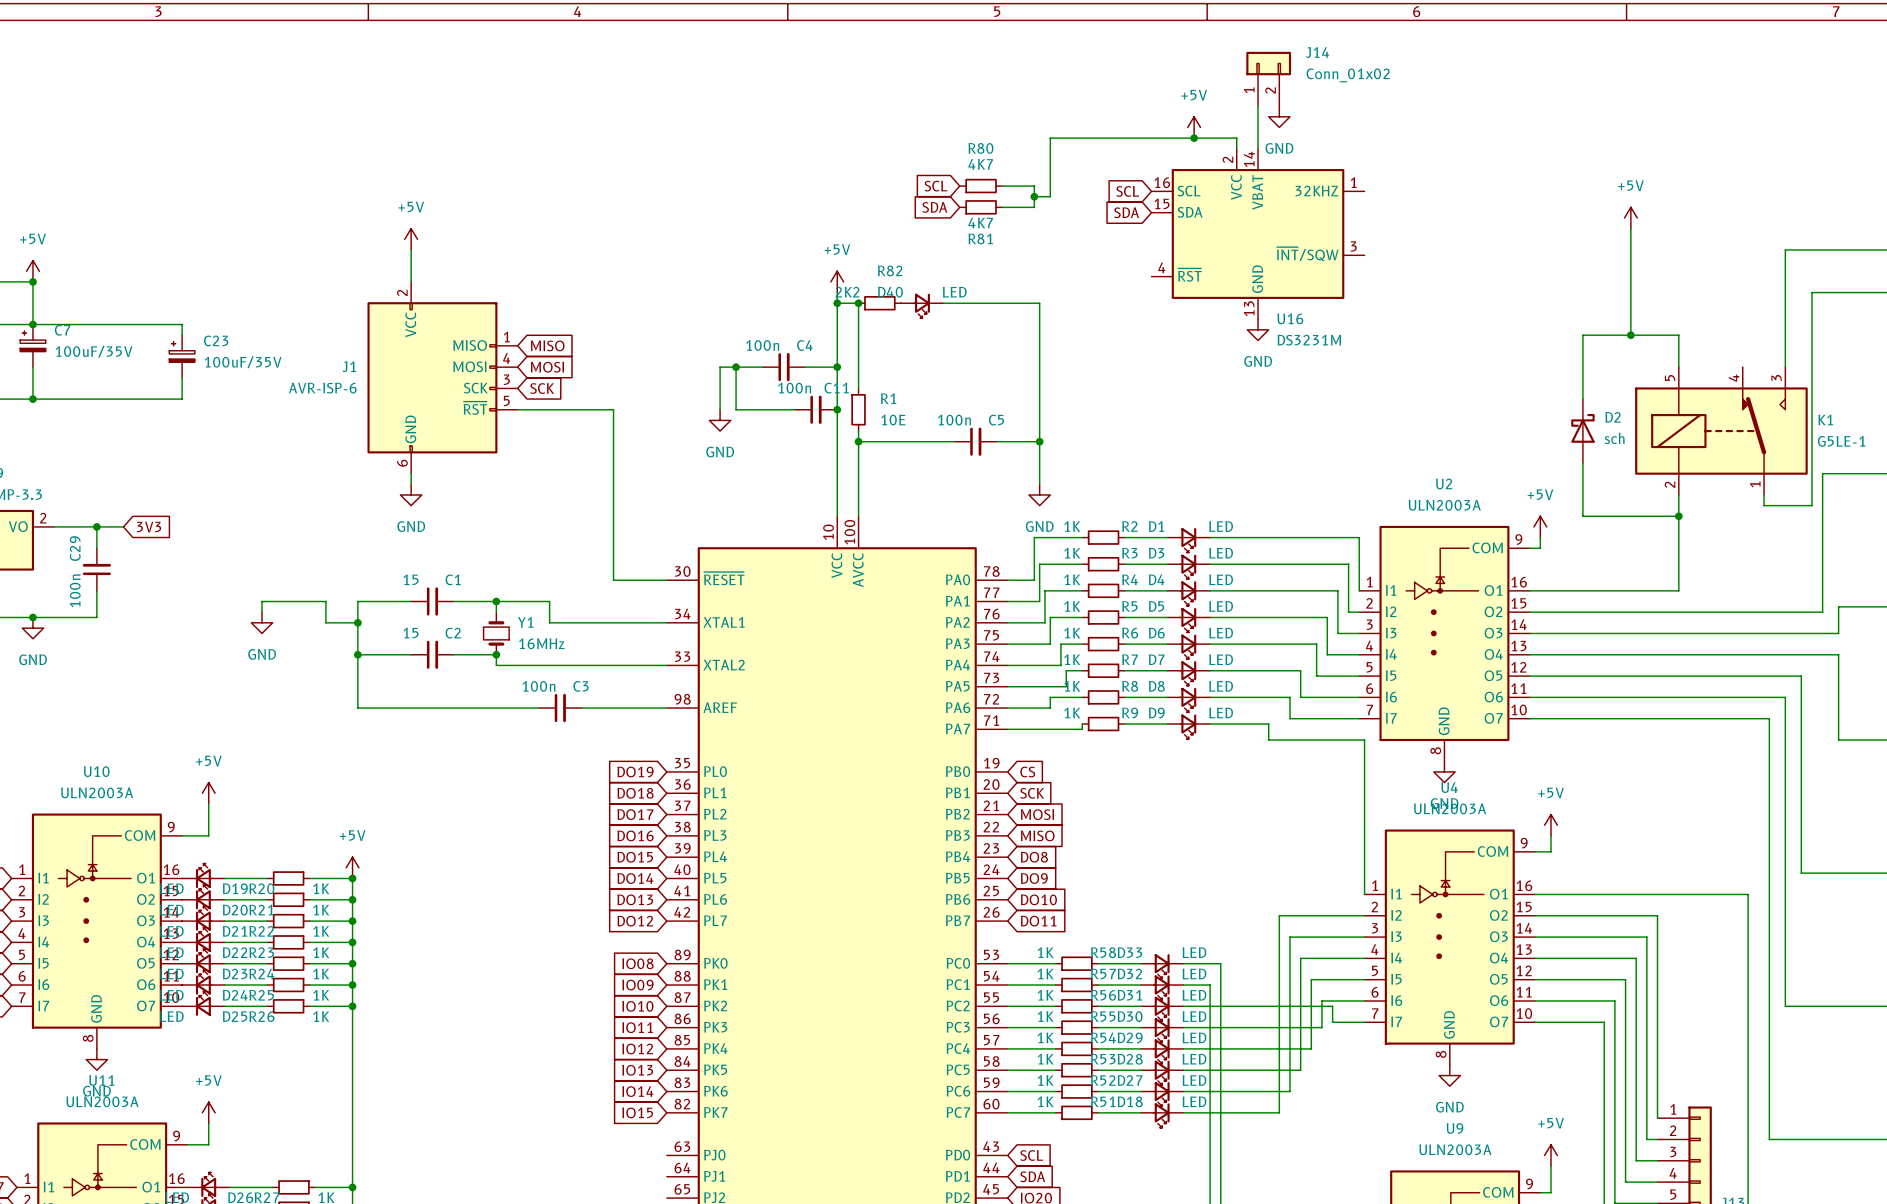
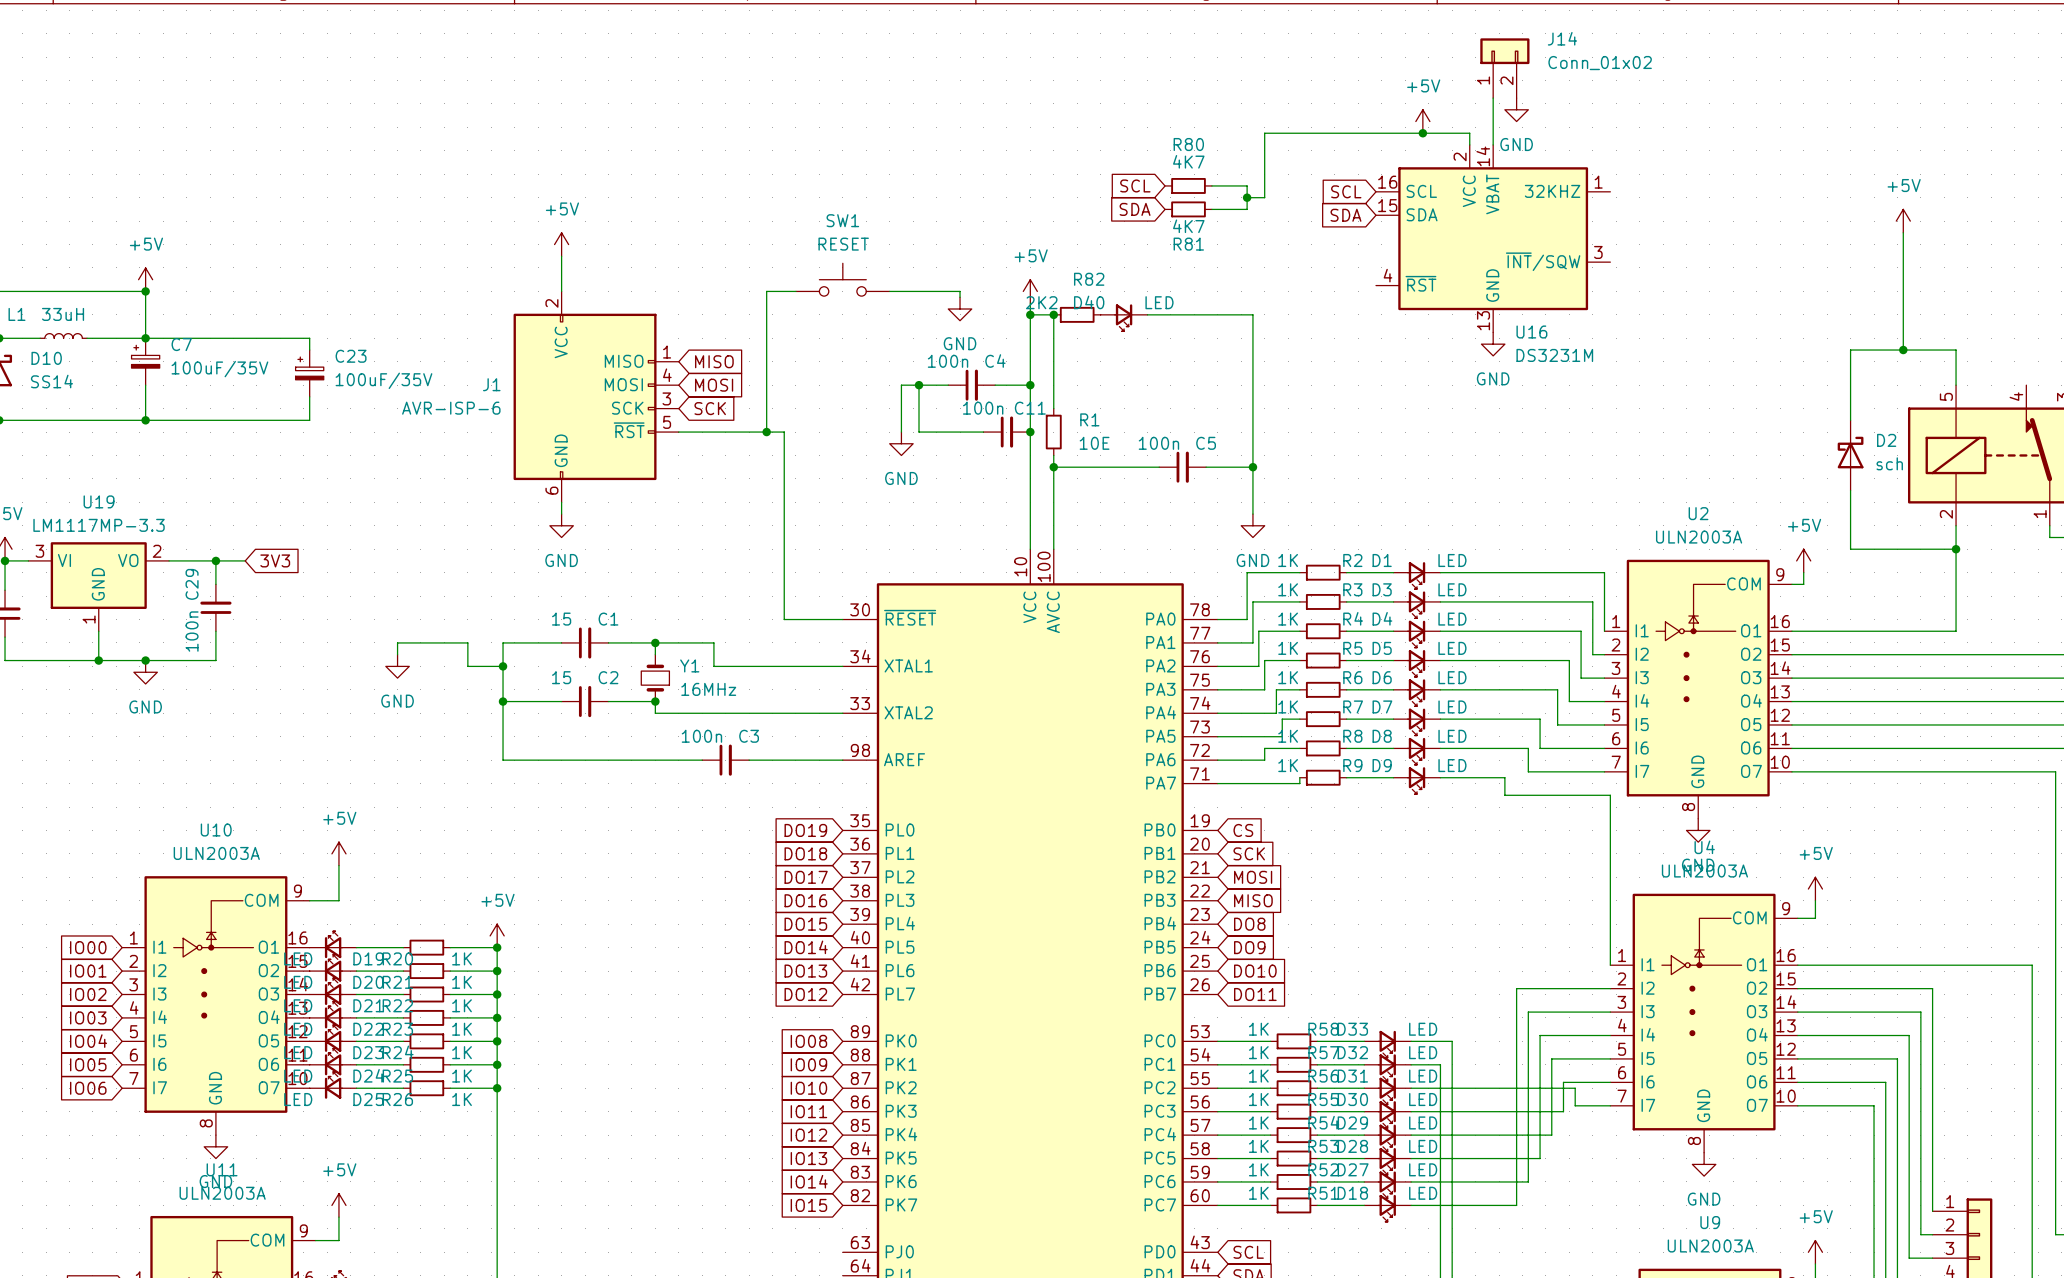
SW1: none -> RESET (842, 279)
wire: none -> (795, 291) (766, 291) (766, 432)
wire: none -> (889, 291) (960, 291) (960, 297)
power symbol: none -> GND (960, 309)
junction: none -> (766, 432)

